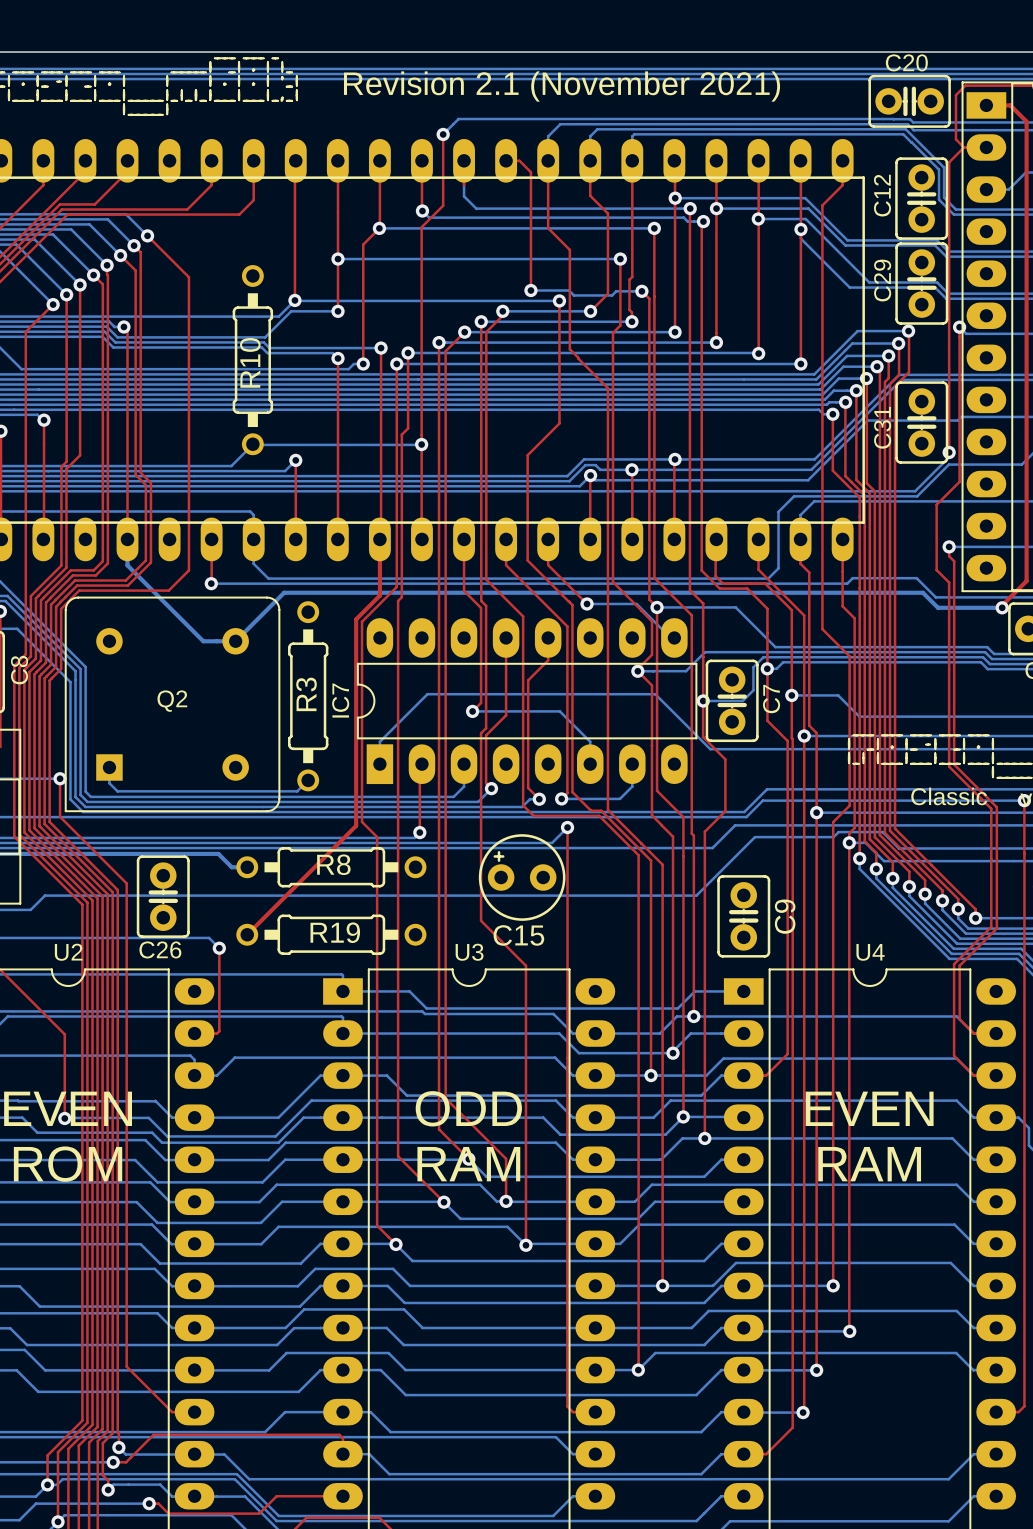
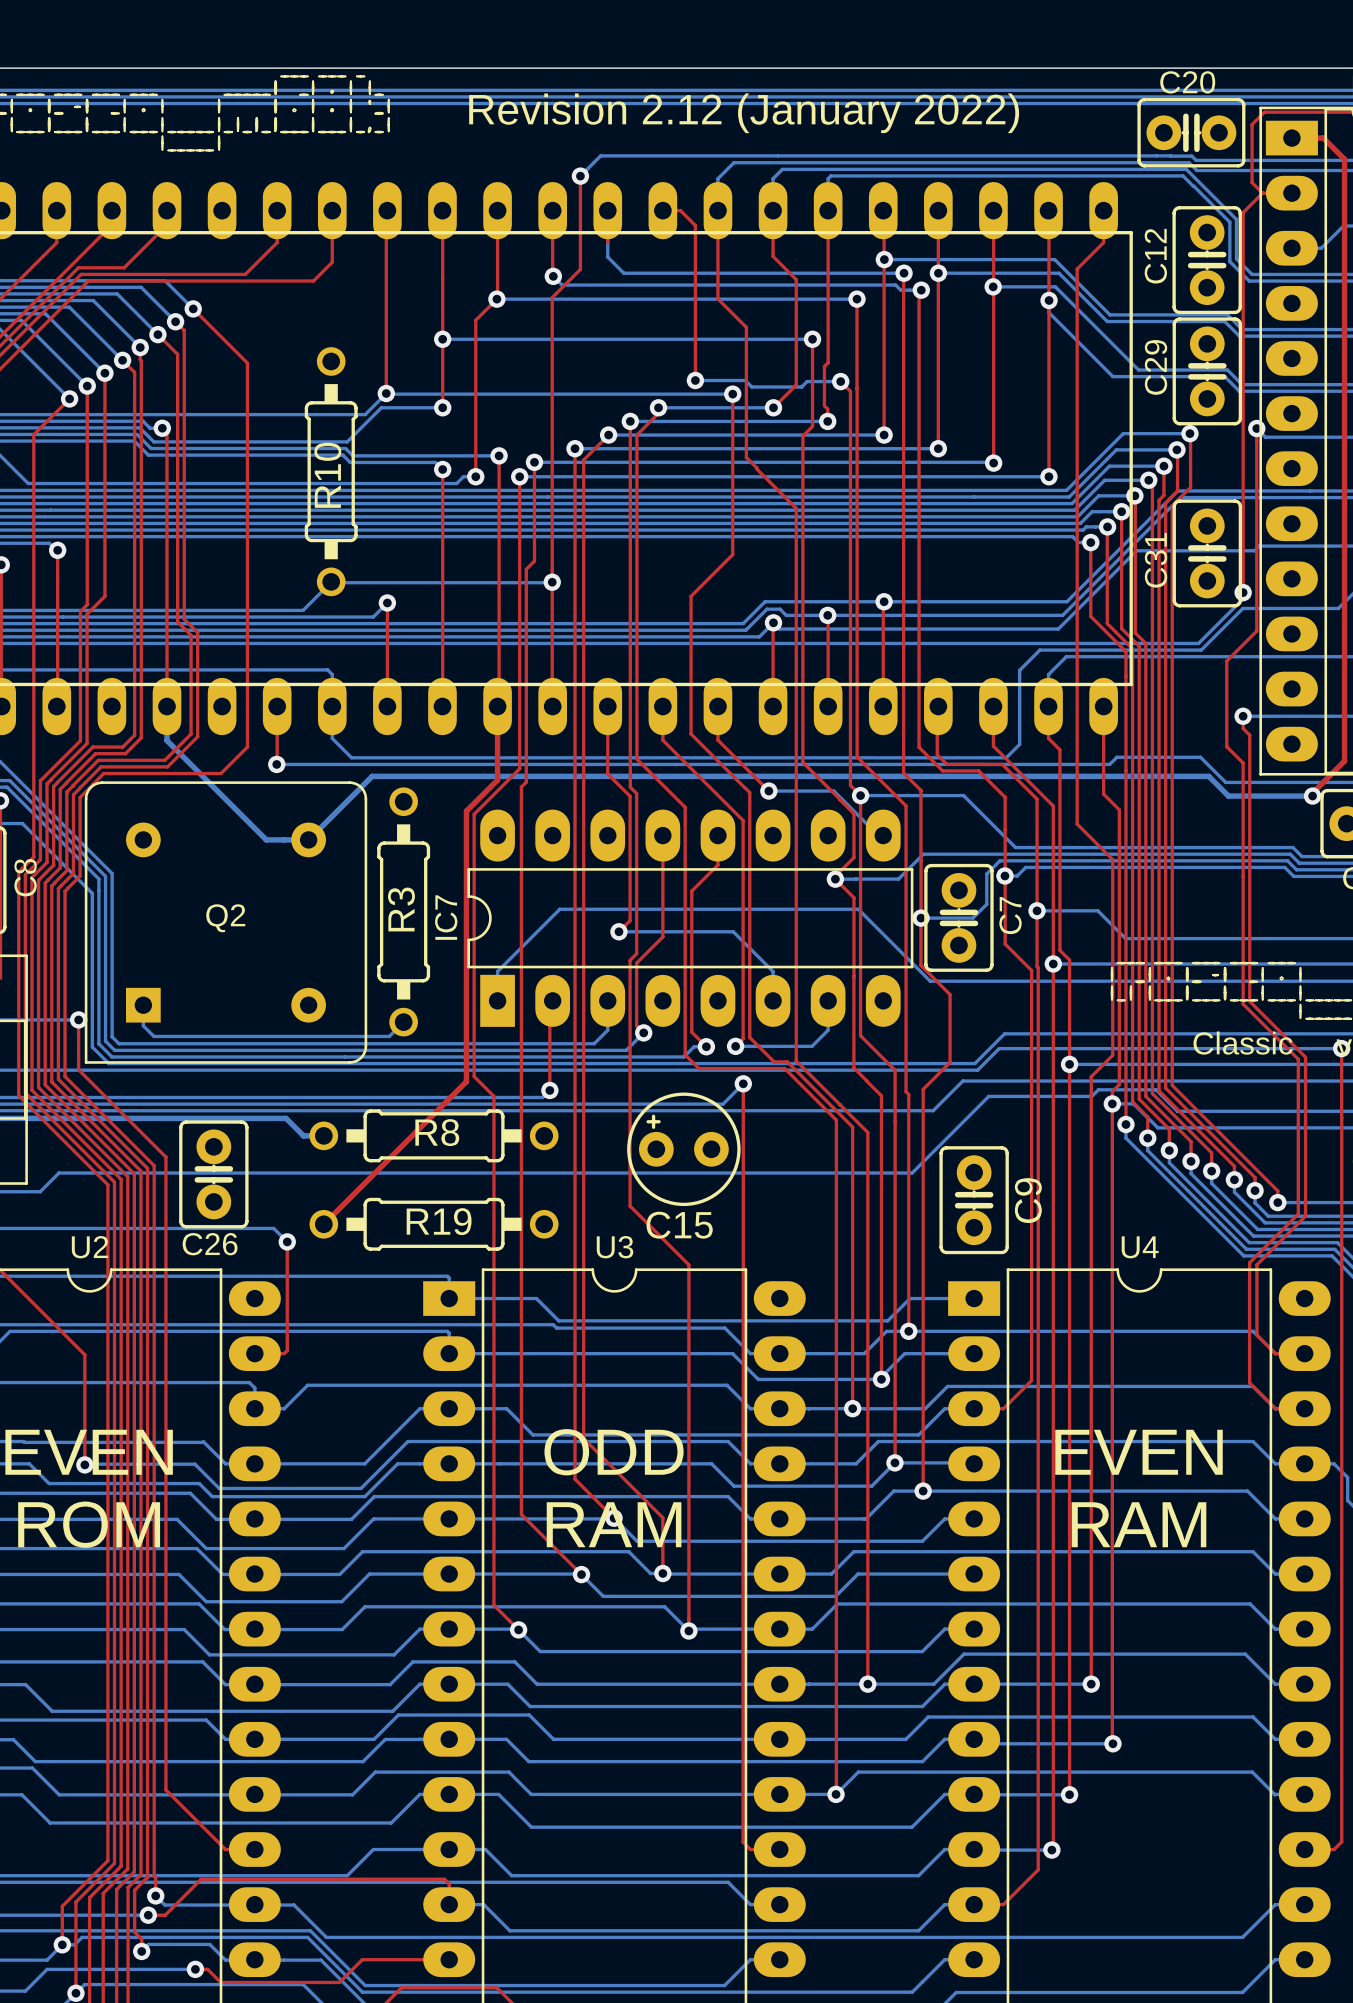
text: Revision 2.1 (November 2021) (562, 86) -> Revision 2.12 (January 2022) (744, 113)

